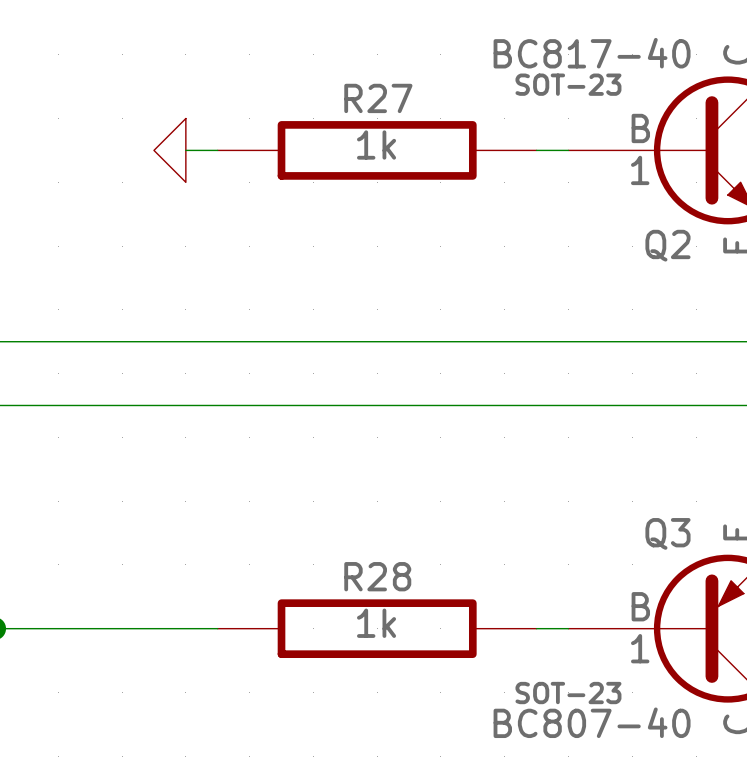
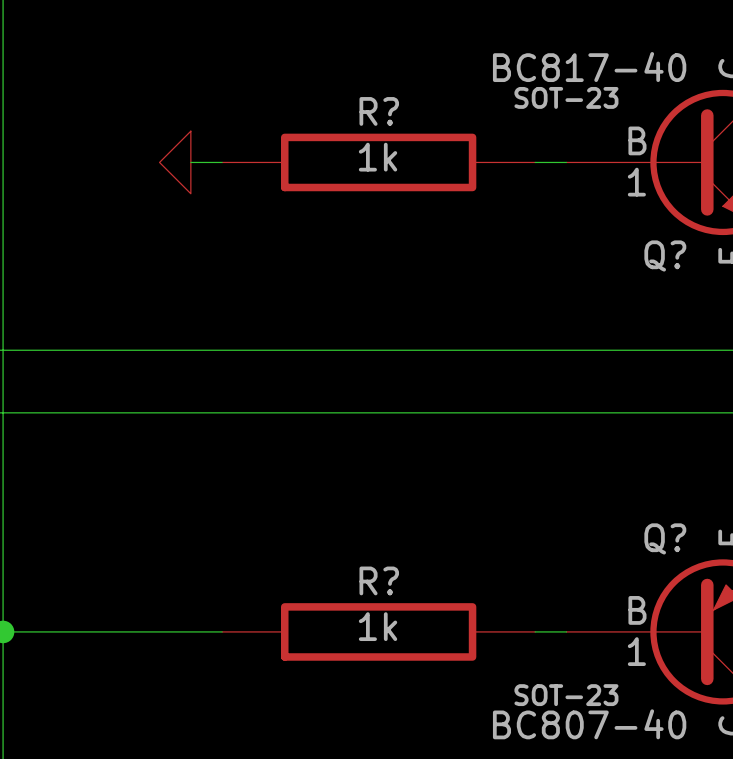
R27 name: R27 (378, 98) -> R? (379, 111)
Q2 name: Q2 (667, 245) -> Q? (665, 255)
Q3 name: Q3 (667, 533) -> Q? (665, 538)
R28 name: R28 (377, 576) -> R? (379, 580)

